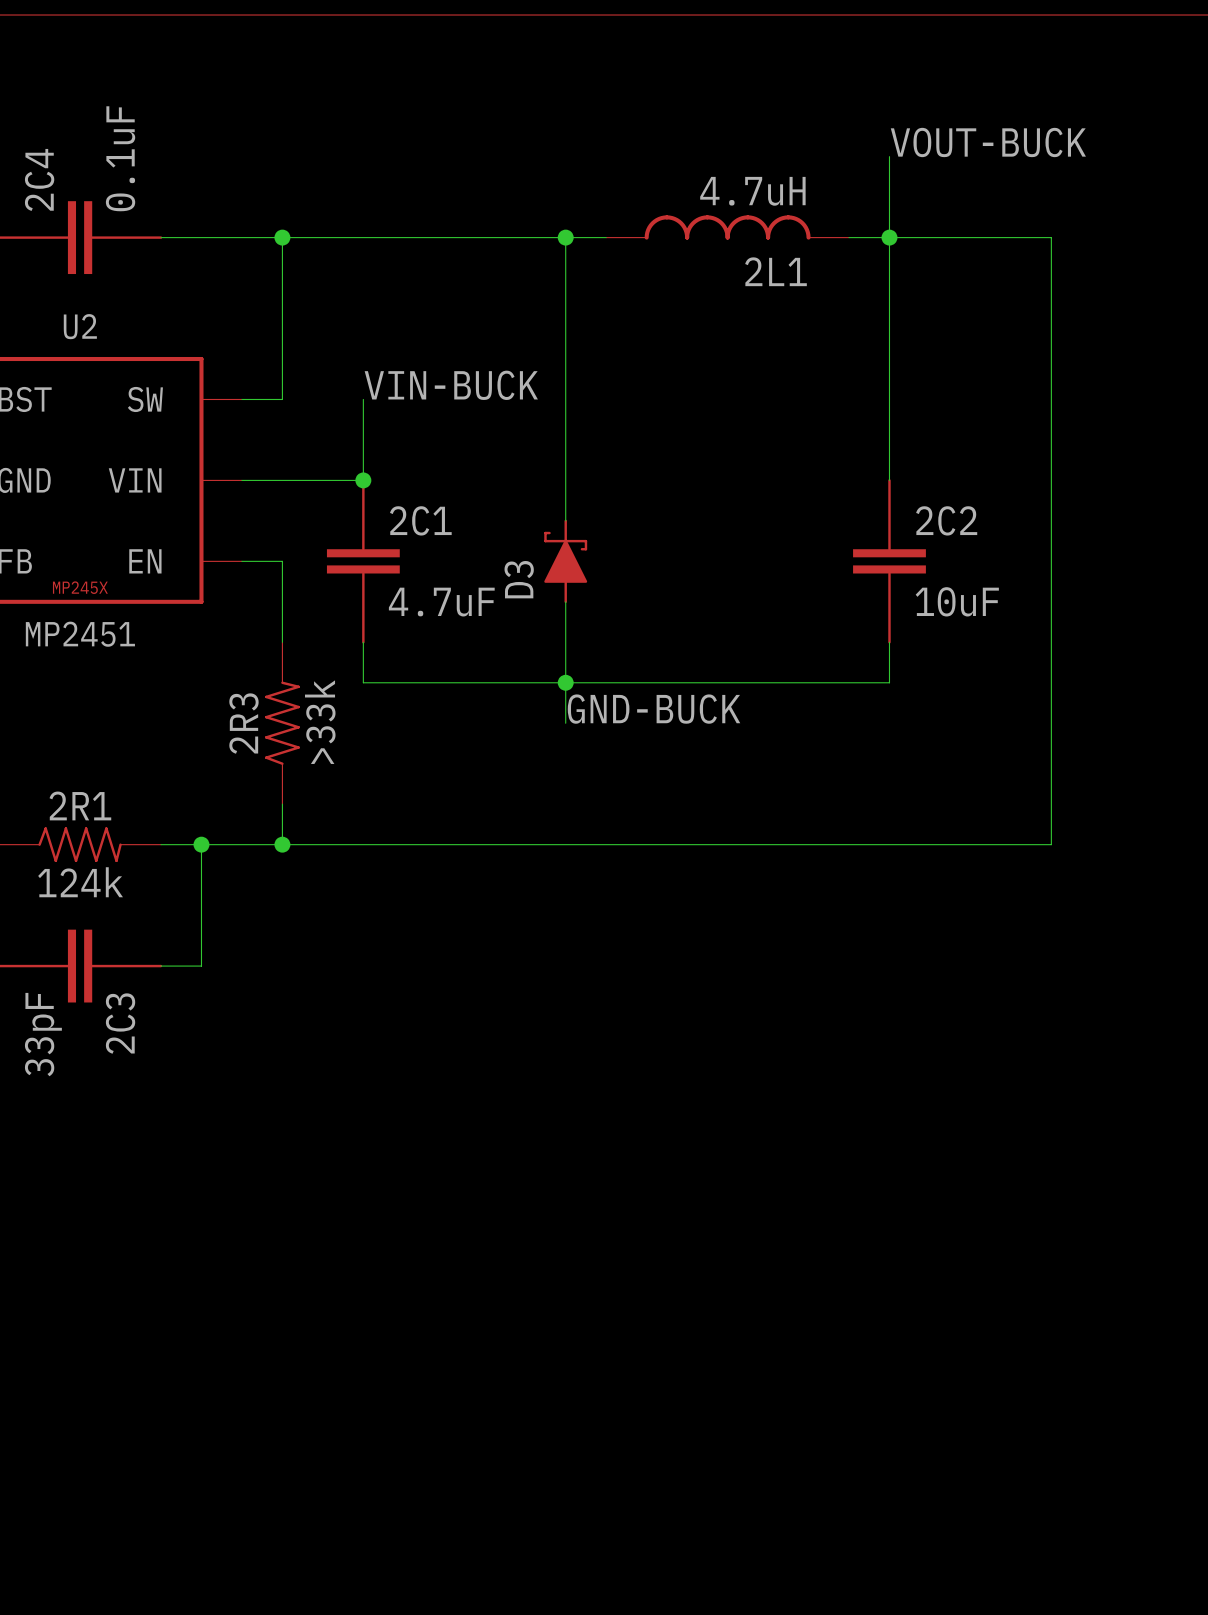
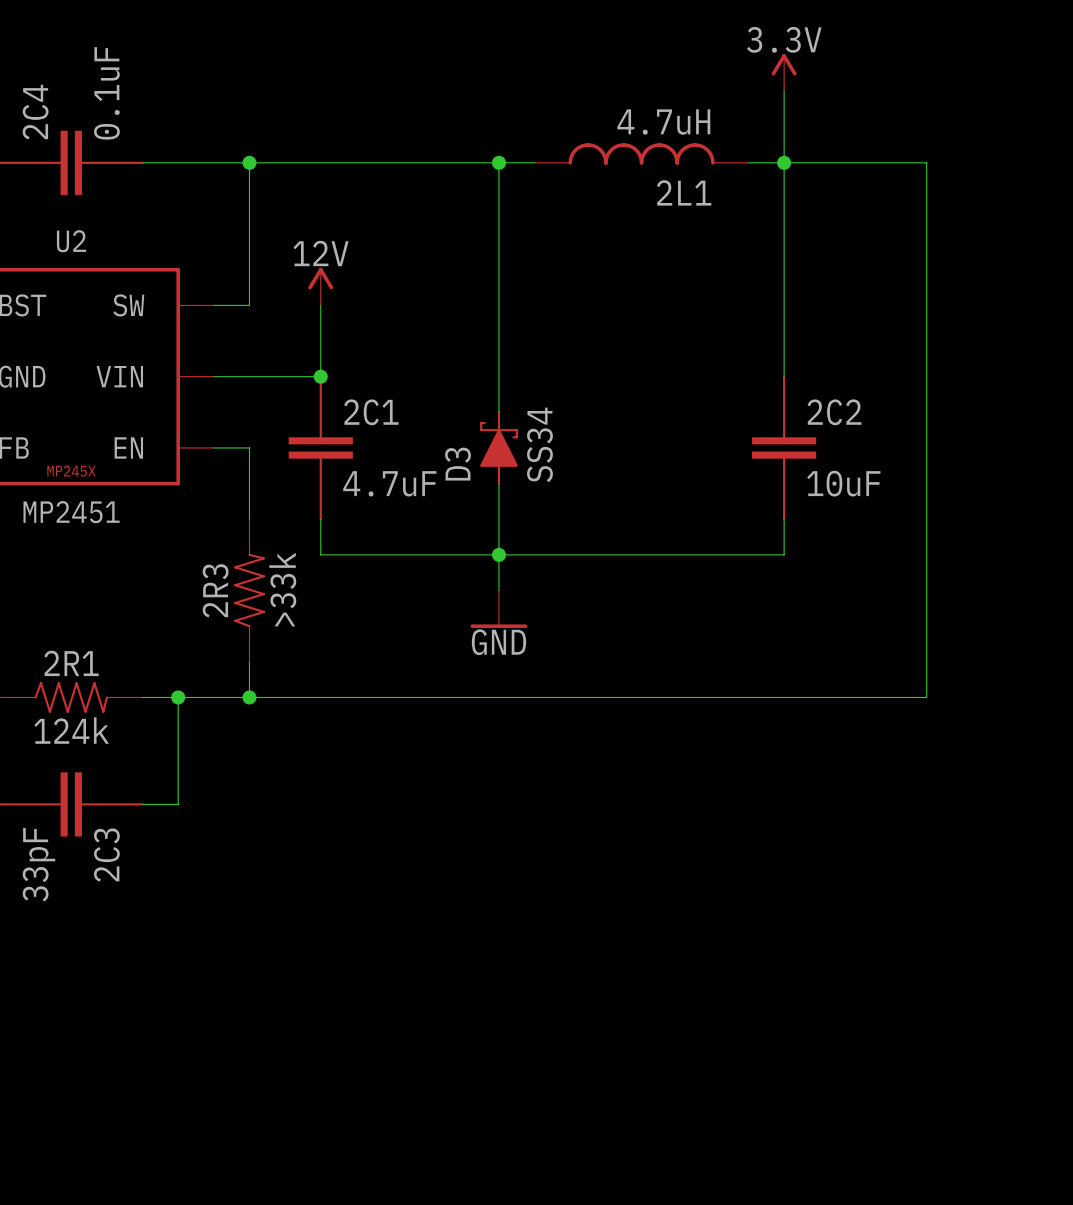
power symbol: none -> 3.3V (784, 72)
label: VOUT-BUCK (988, 142) -> none
power symbol: none -> 12V (320, 286)
label: VIN-BUCK (451, 385) -> none
D3 value: none -> SS34 (539, 444)
label: GND-BUCK (654, 709) -> none
power symbol: none -> GND (498, 609)

